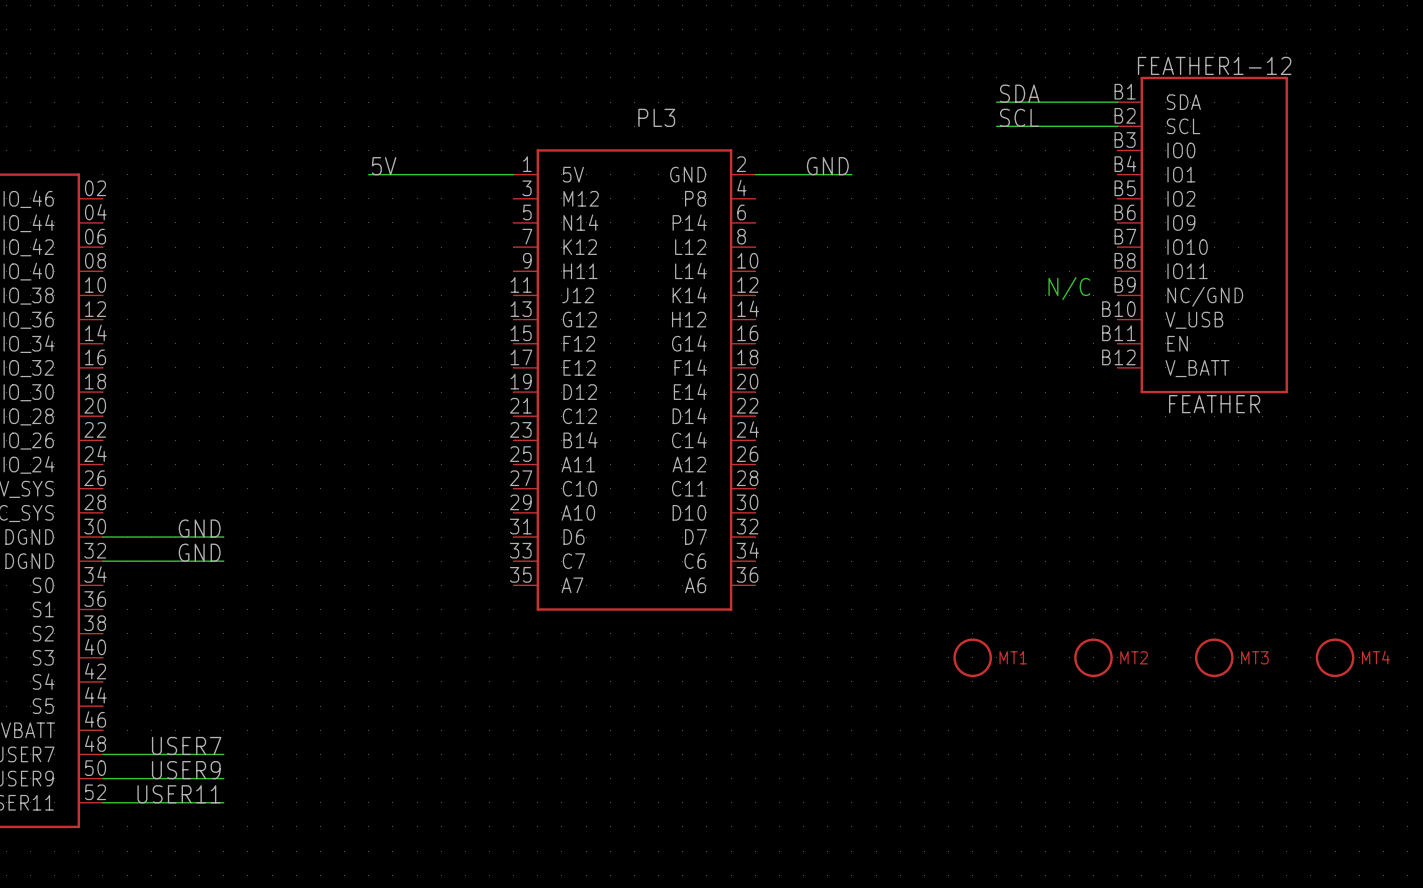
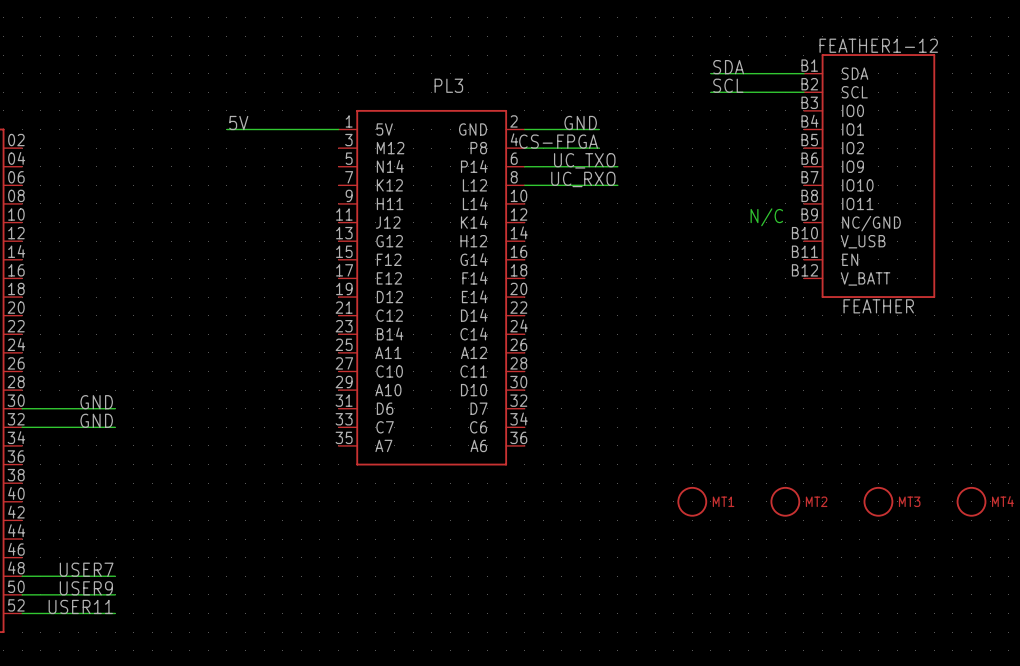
label: none -> CS-FPGA (558, 141)
wire: none -> (524, 148) (599, 148)
label: none -> UC_TXO (584, 160)
wire: none -> (524, 166) (617, 166)
label: none -> UC_RXO (583, 179)
wire: none -> (524, 185) (617, 185)

